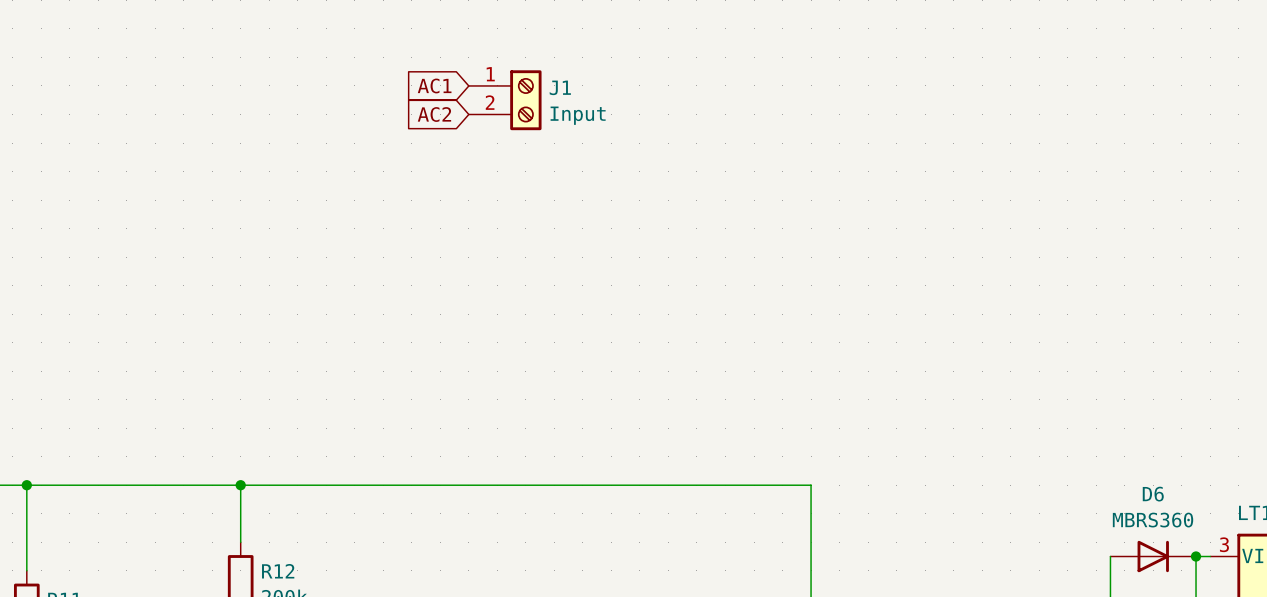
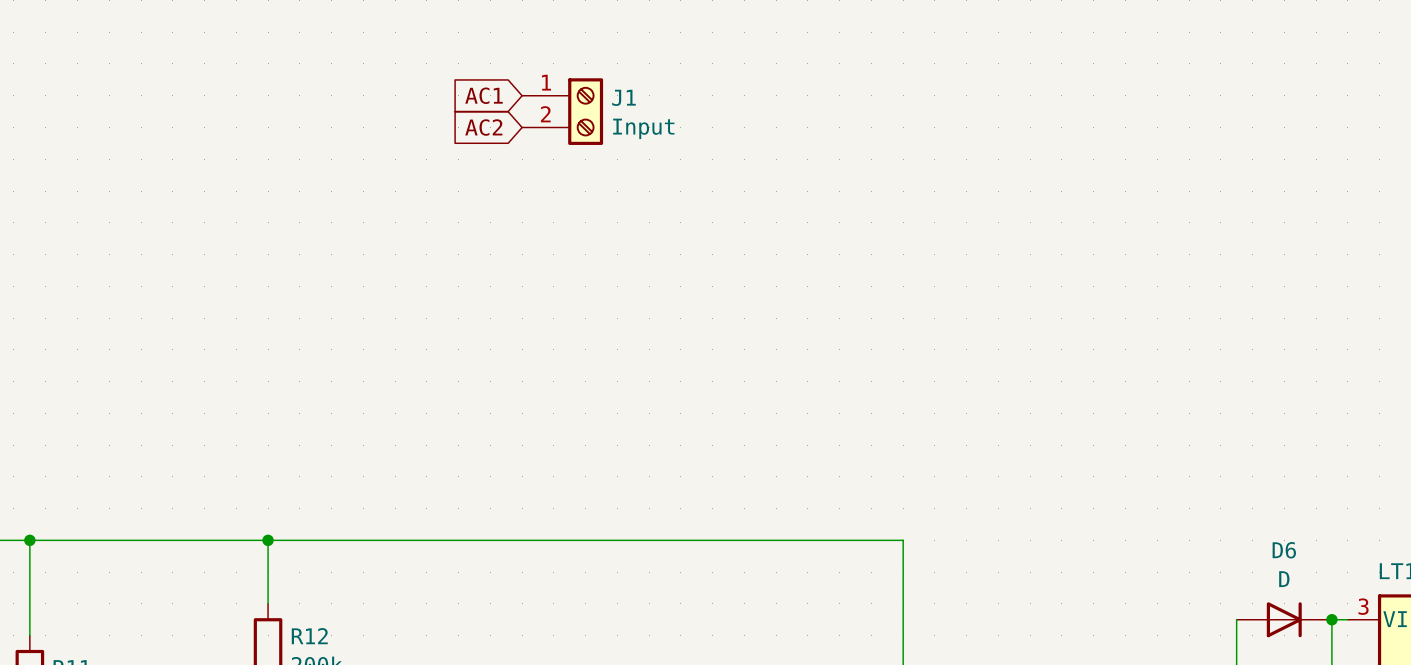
D6 value: MBRS360 (1153, 520) -> D (1284, 579)

